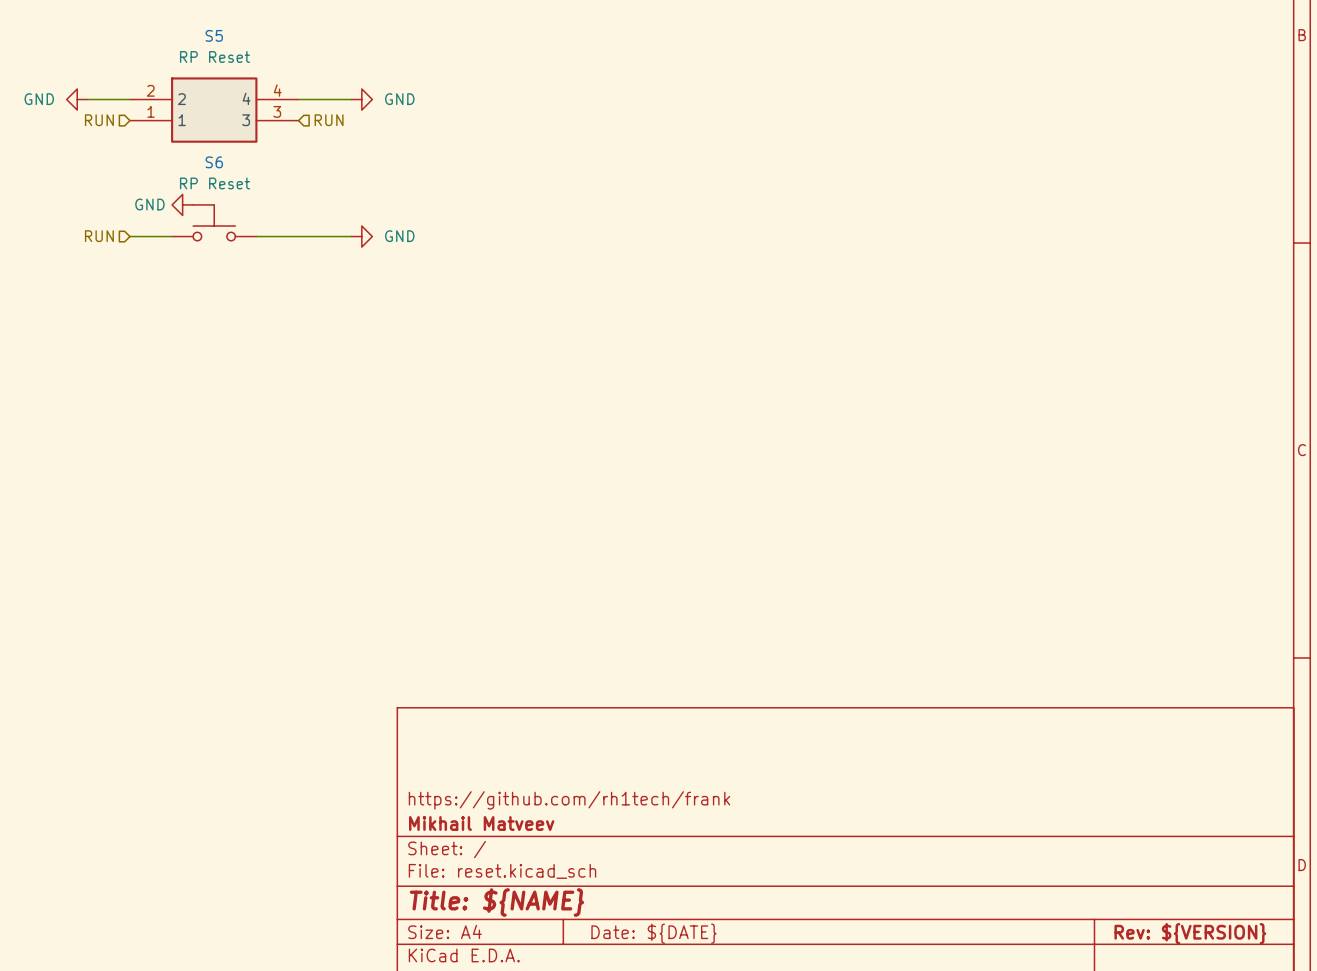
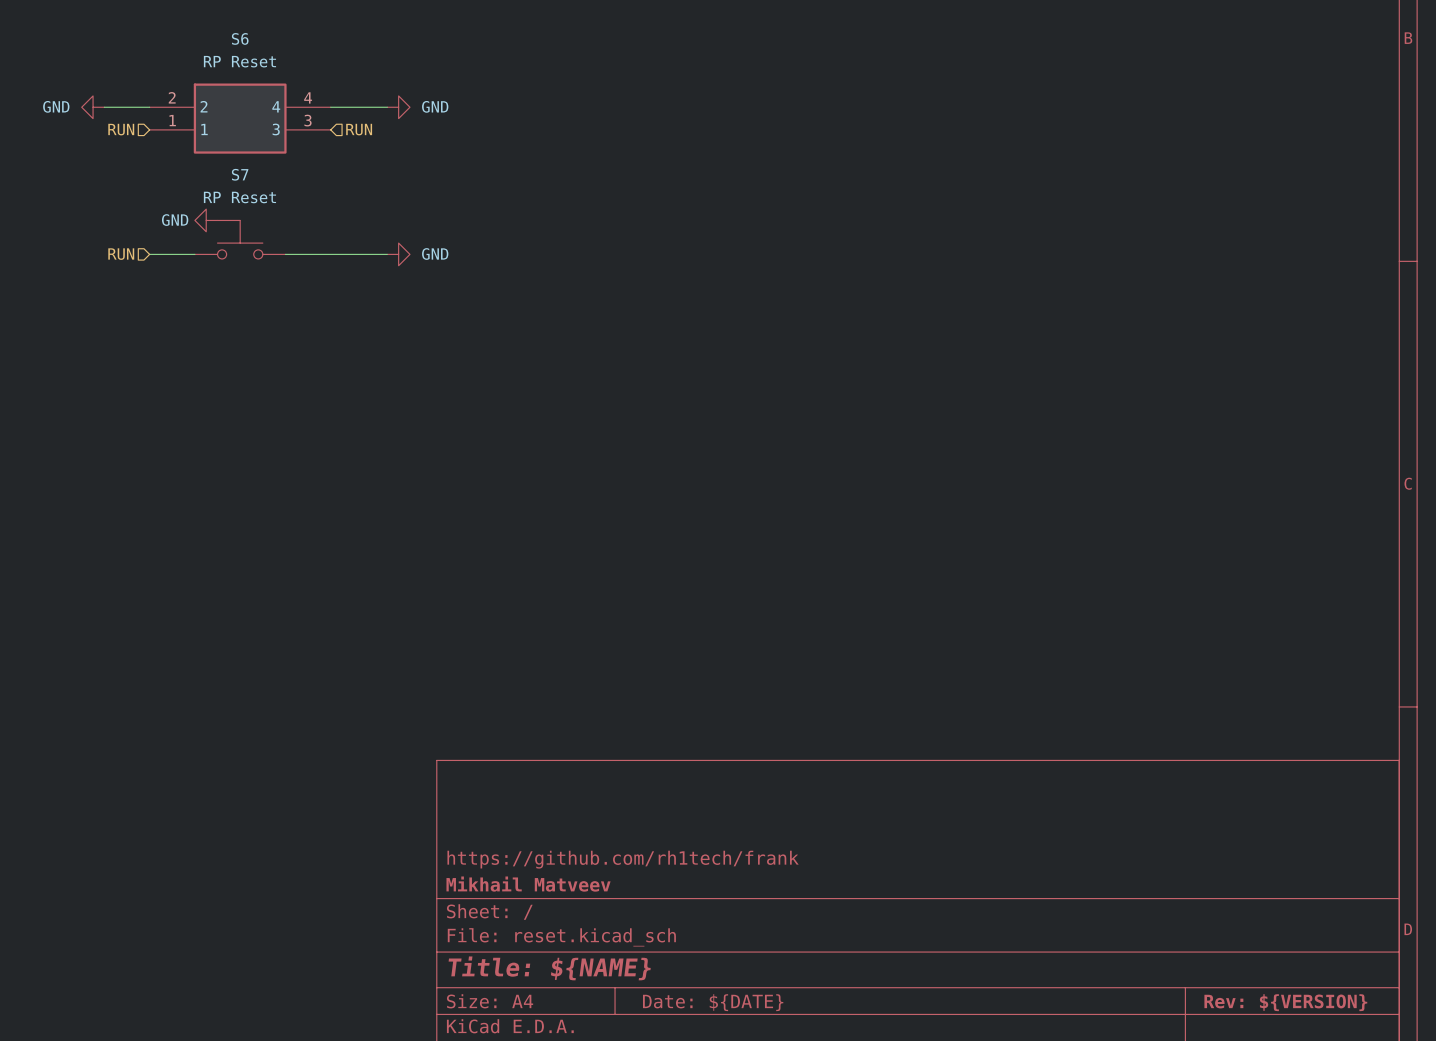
S5 name: S5 (214, 35) -> S6 (240, 38)
S6 name: S6 (214, 162) -> S7 (240, 174)

